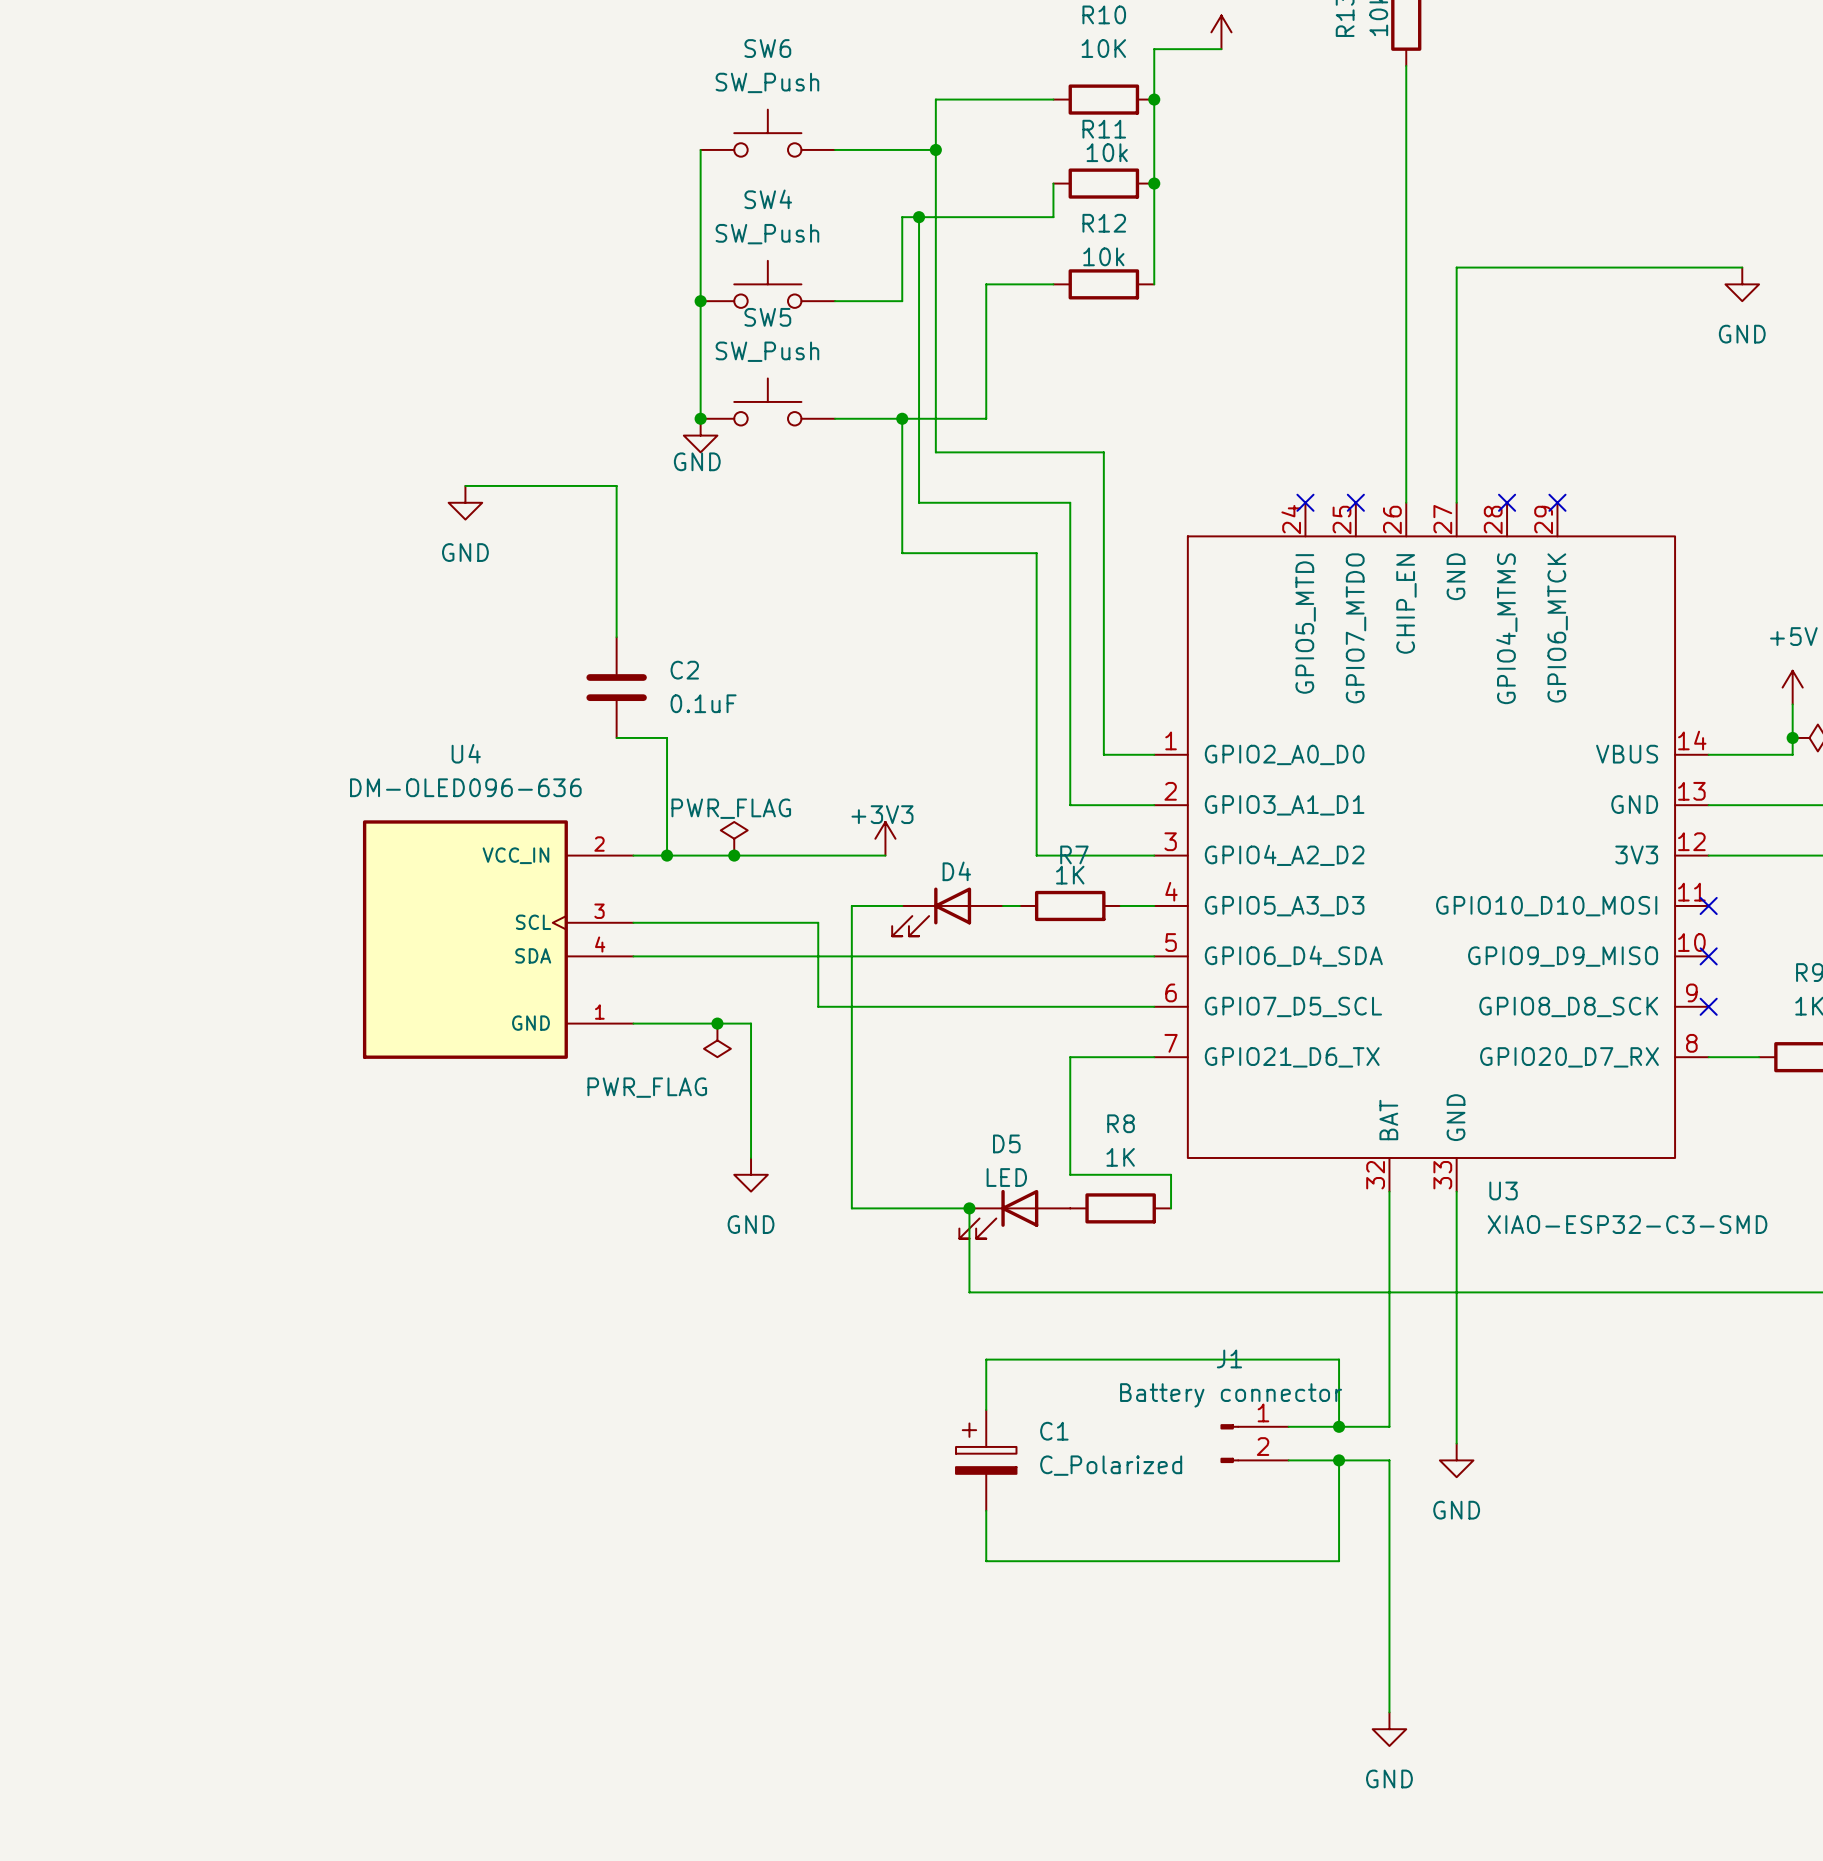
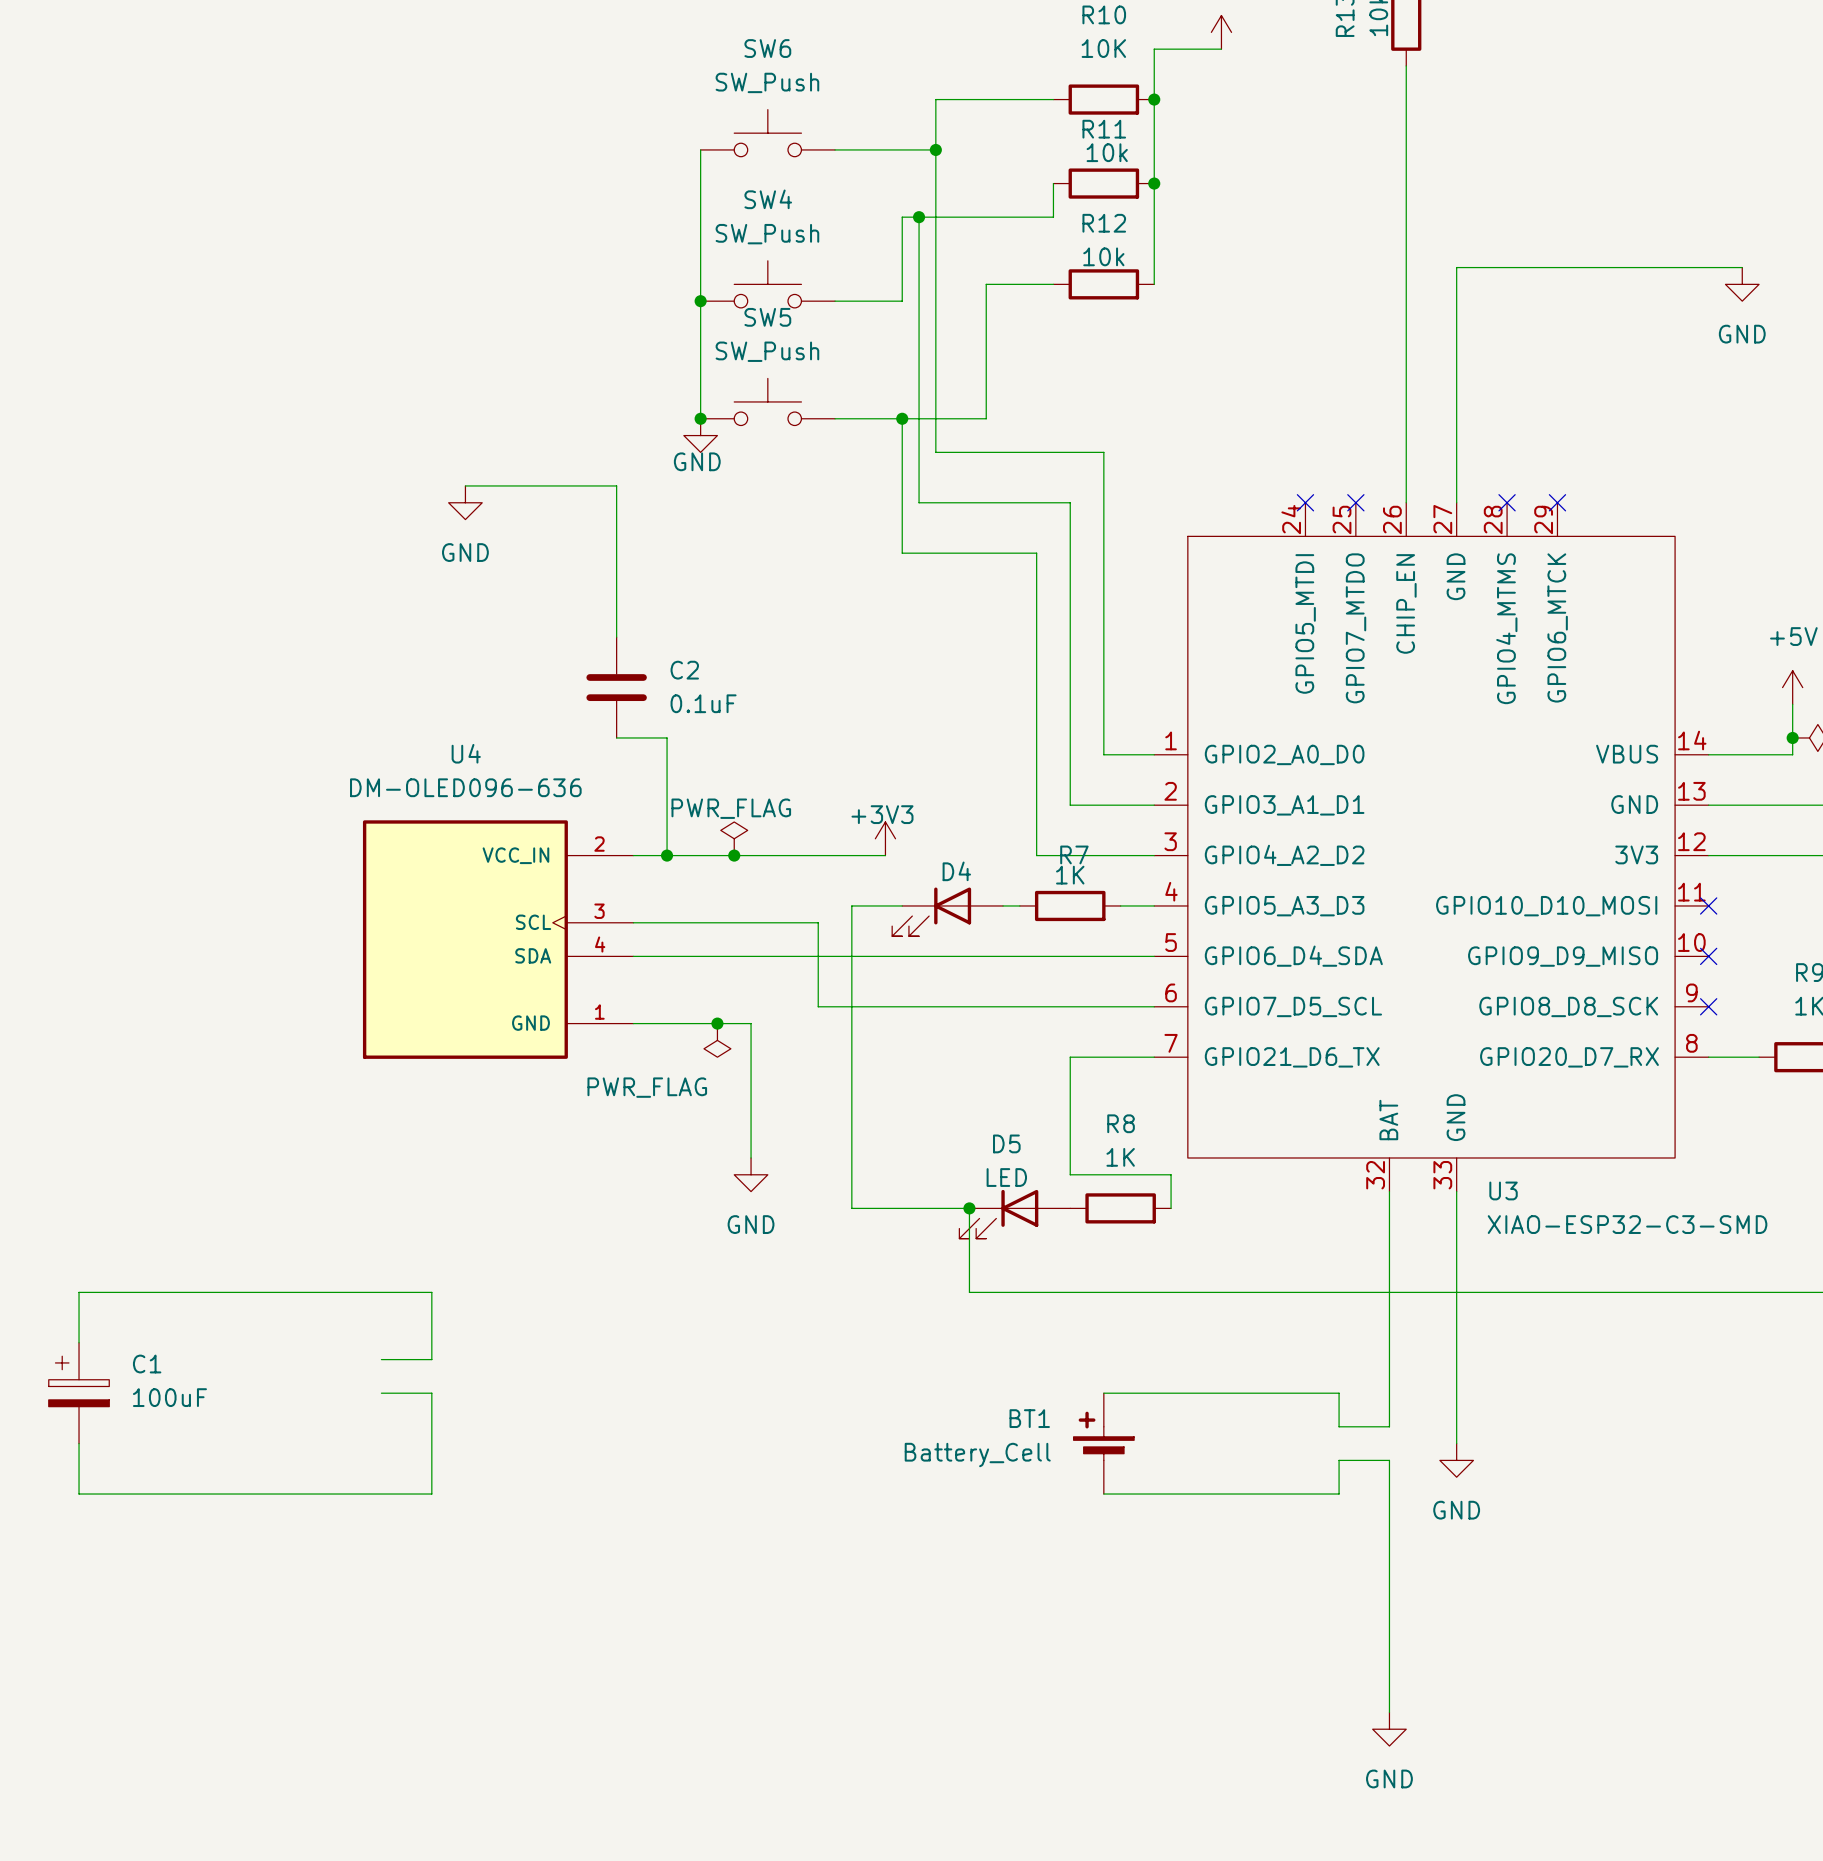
wire: none -> (79, 1342) (79, 1292) (431, 1292) (431, 1359) (381, 1359)
wire: none -> (381, 1393) (431, 1393) (431, 1494) (79, 1494) (79, 1443)
wire: (1339, 1393) (1339, 1359) (986, 1359) (986, 1410) -> (1339, 1393) (1103, 1393)
wire: (1288, 1426) (1339, 1426) -> none
junction: (1339, 1426) -> none
BT1: none -> Battery_Cell (1103, 1443)
J1: Battery connector (1254, 1443) -> none
C1 position: (986, 1460) -> (79, 1393)
wire: (1288, 1460) (1339, 1460) -> none
junction: (1339, 1460) -> none
C1 value: C_Polarized (1111, 1465) -> 100uF (169, 1397)
wire: (1339, 1494) (1339, 1561) (986, 1561) (986, 1510) -> (1339, 1494) (1103, 1494)

